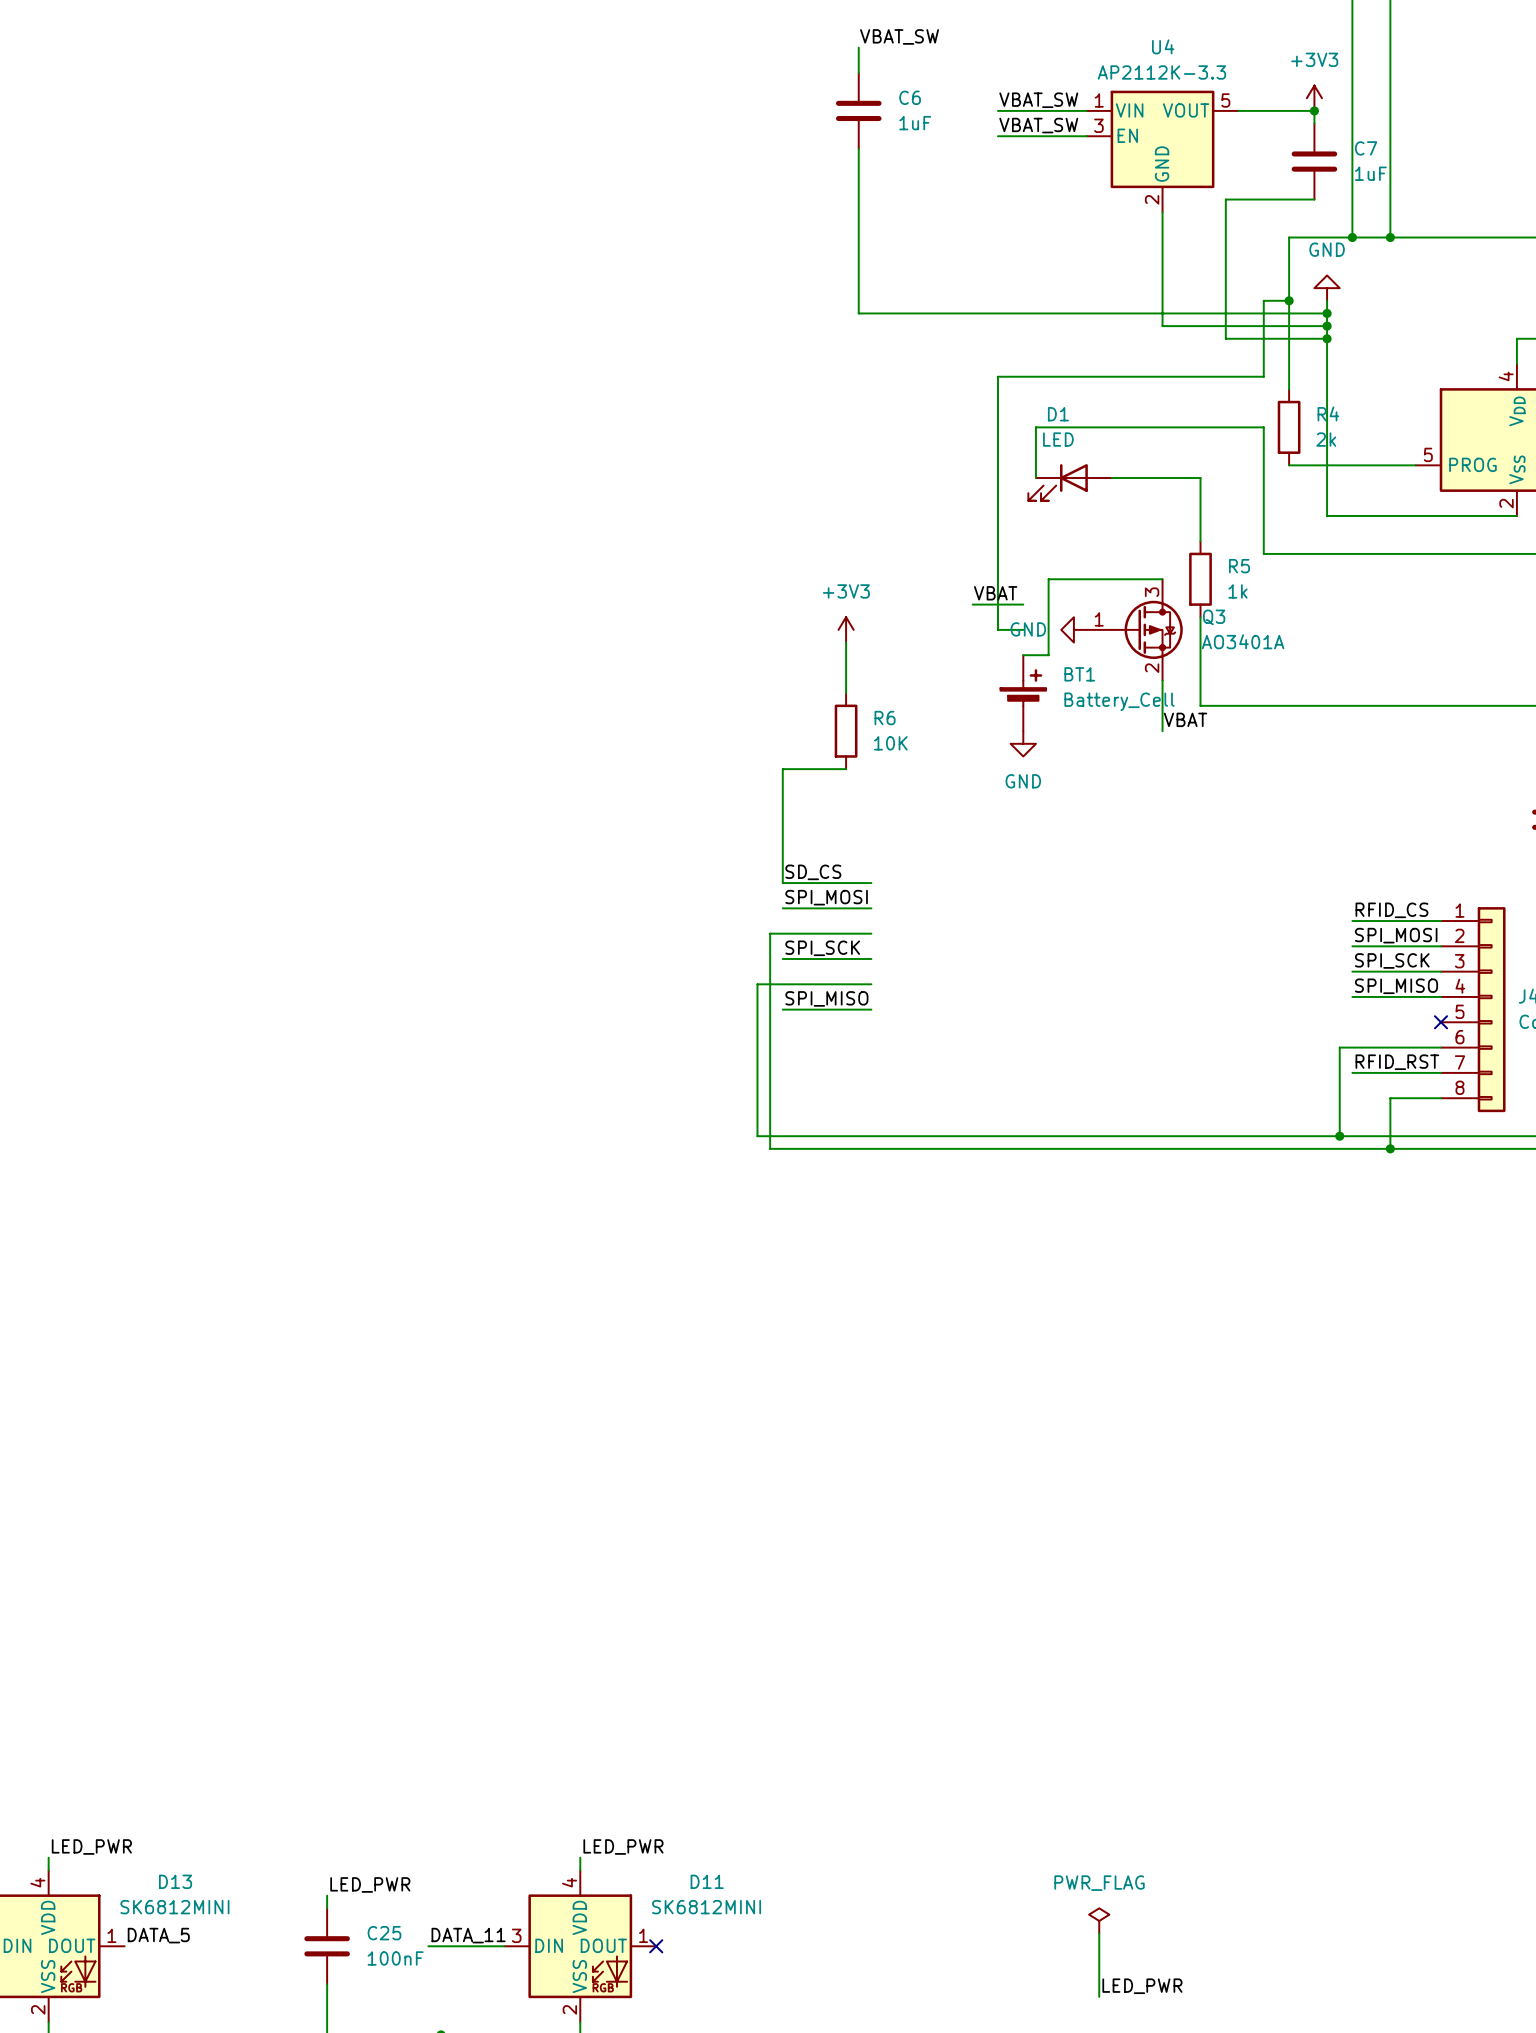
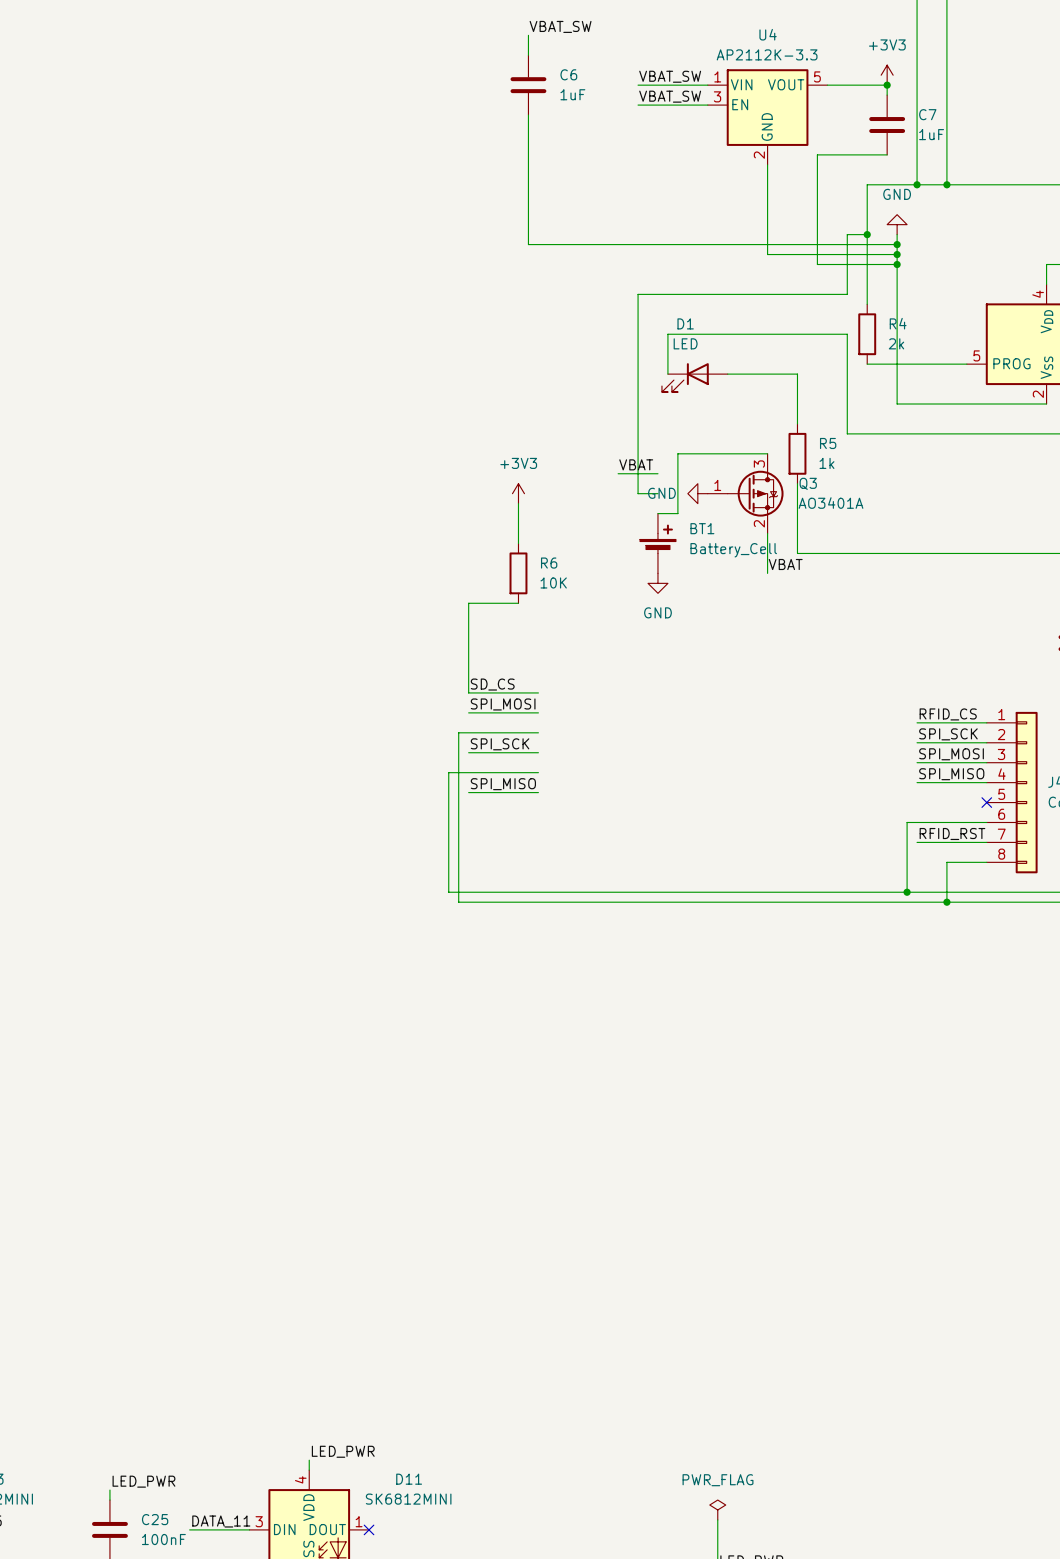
label: SPI_MOSI (1396, 935) -> SPI_SCK (948, 734)
label: SPI_SCK (1392, 960) -> SPI_MOSI (951, 754)

